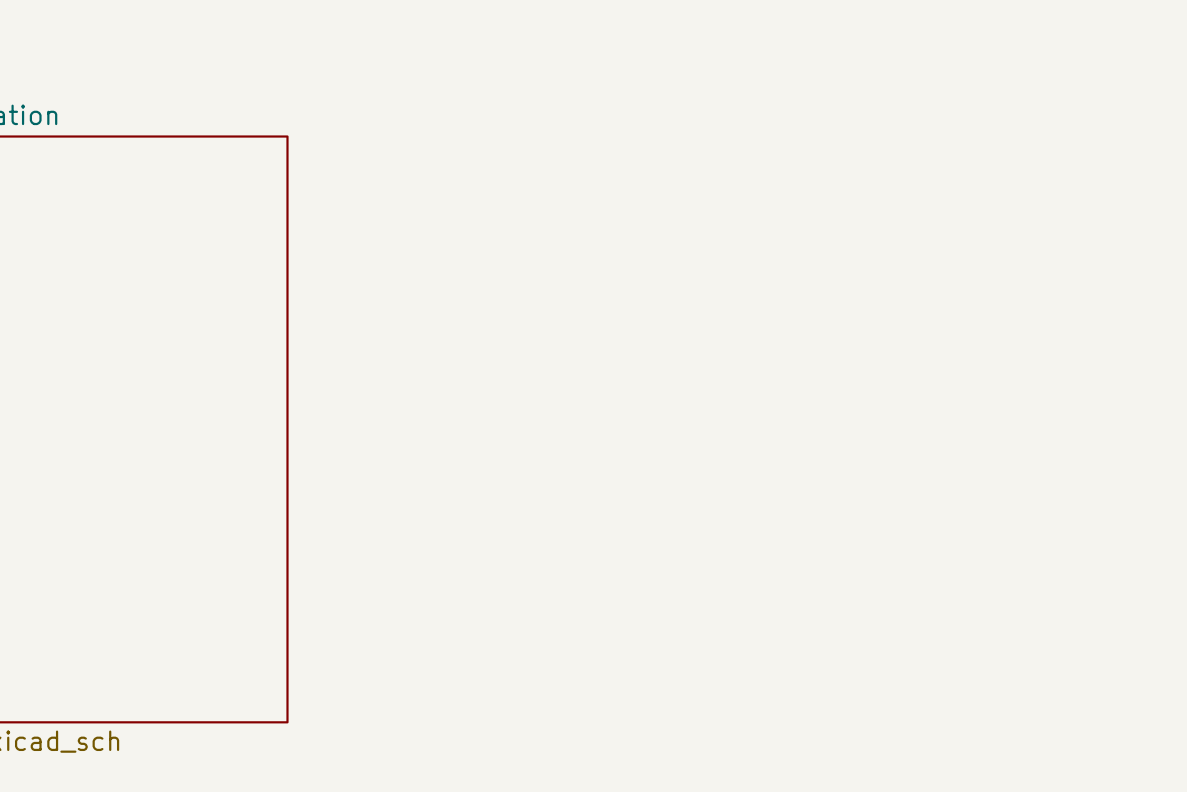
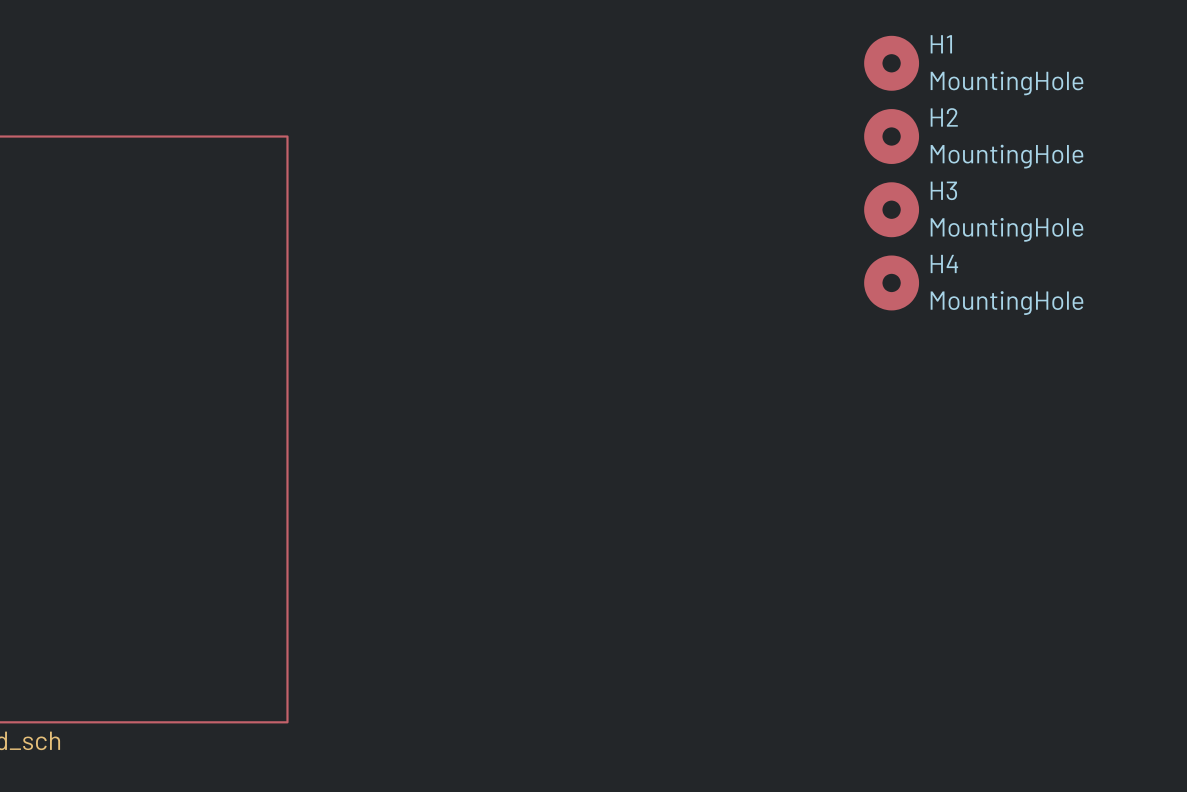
H1: none -> MountingHole (891, 63)
H2: none -> MountingHole (891, 136)
H3: none -> MountingHole (891, 209)
H4: none -> MountingHole (891, 282)

